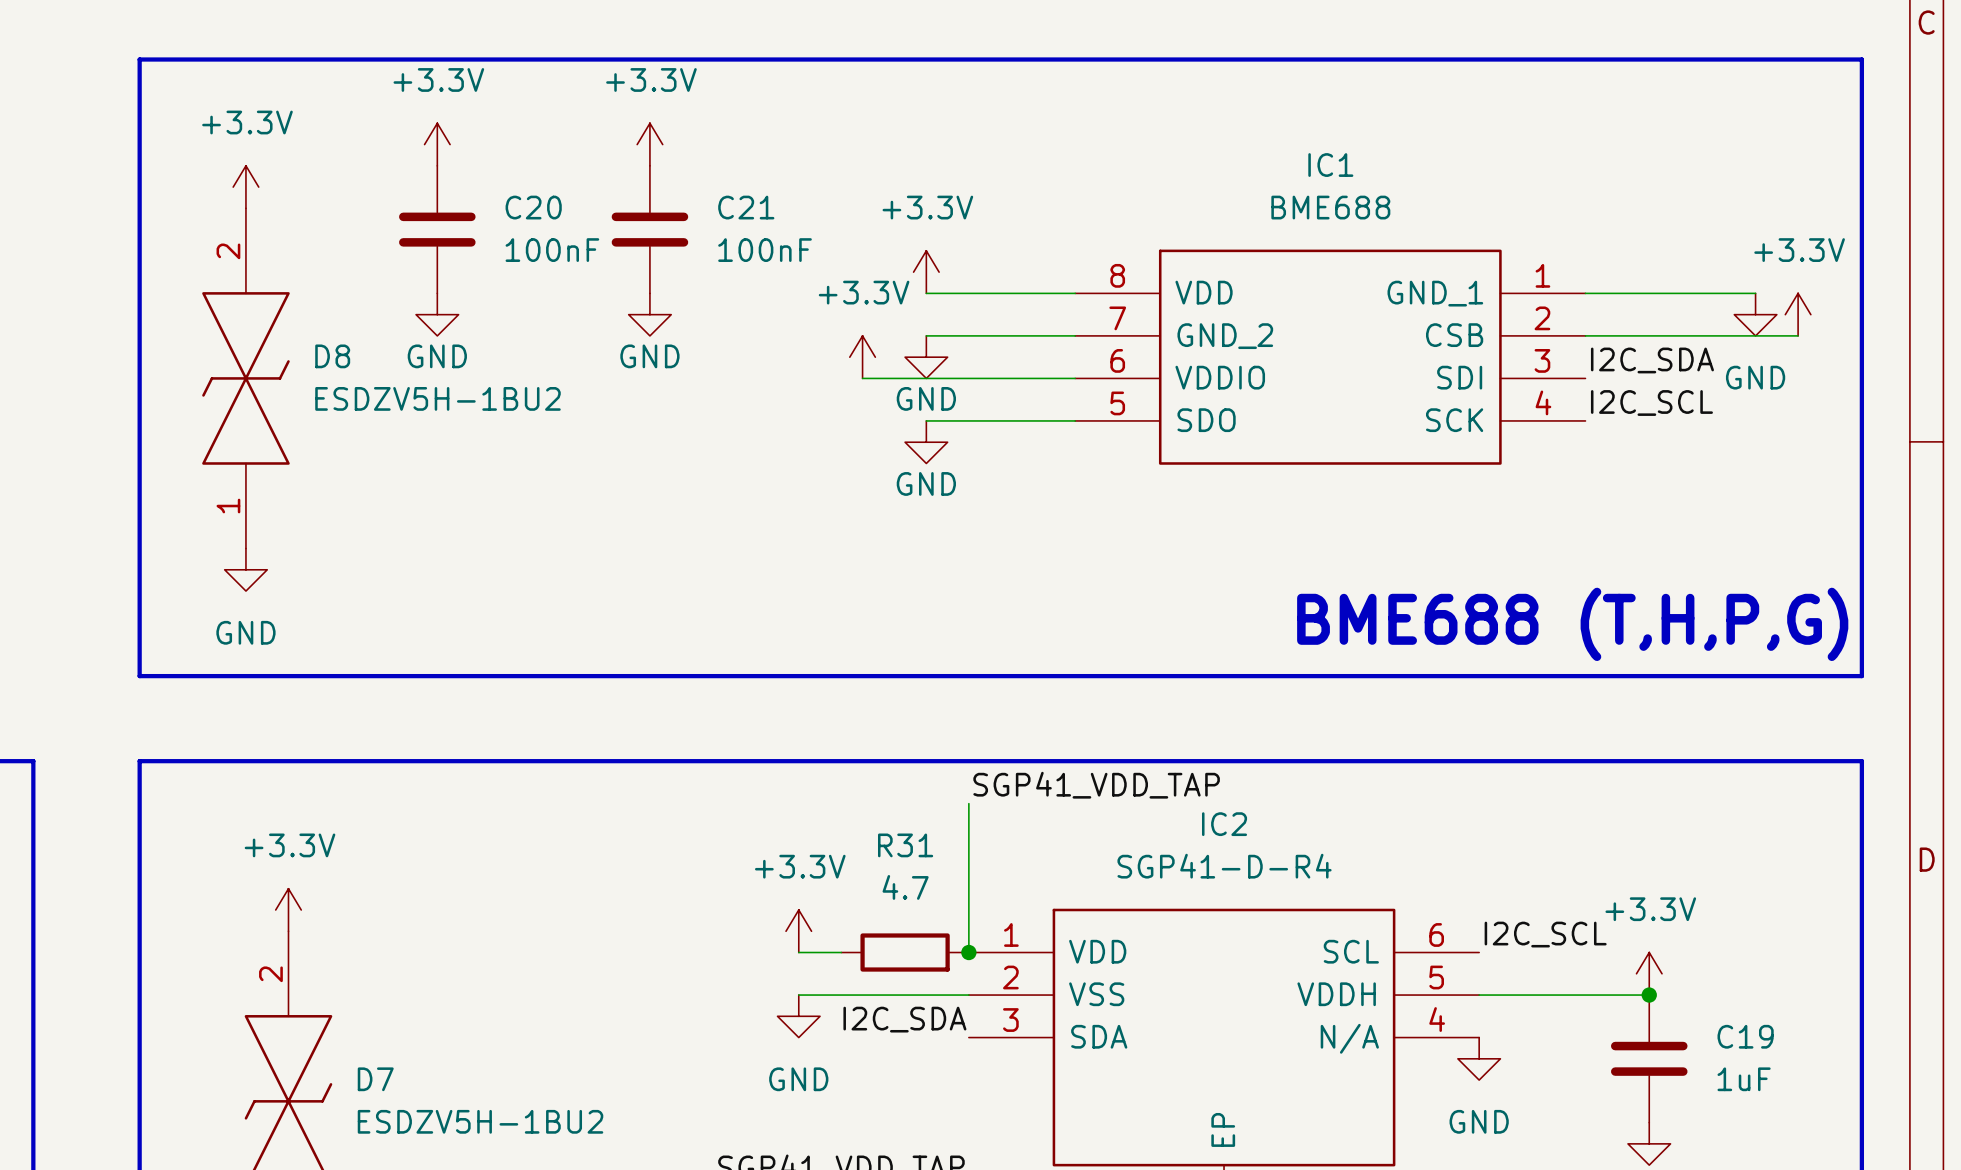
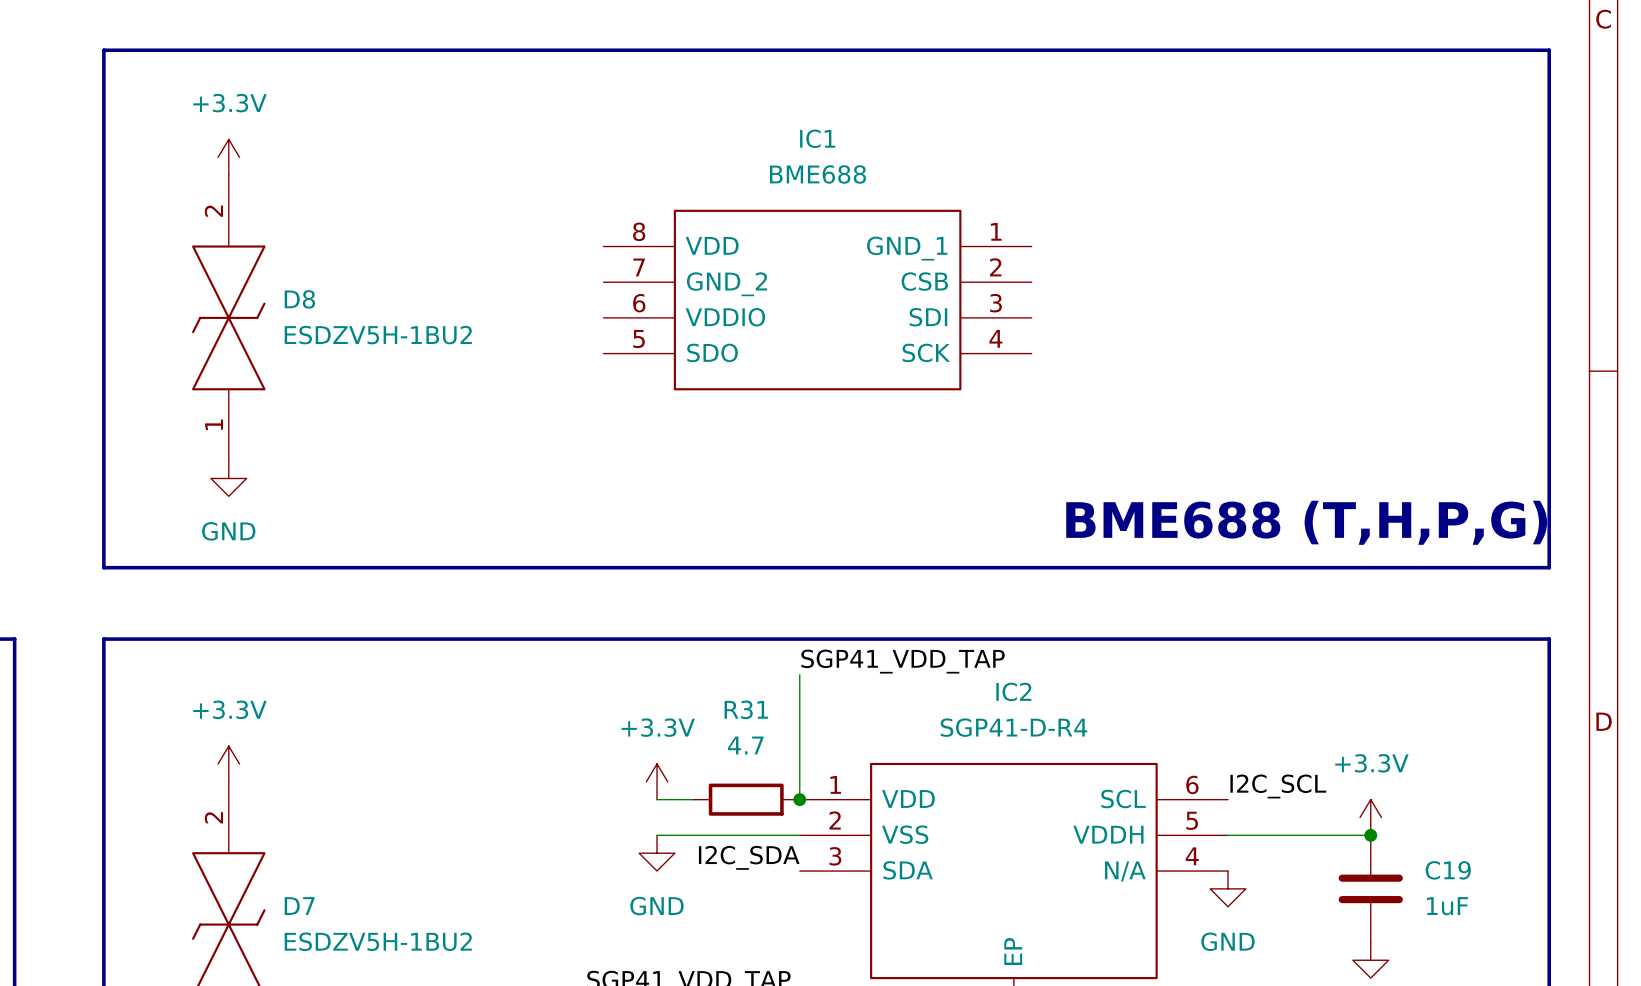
power symbol: +3.3V (437, 144) -> none
power symbol: +3.3V (649, 144) -> none
power symbol position: +3.3V (245, 187) -> +3.3V (228, 157)
C20: 100nF (437, 229) -> none
C21: 100nF (649, 229) -> none
power symbol: +3.3V (926, 272) -> none
wire: (926, 293) (1075, 293) -> none
wire: (1585, 293) (1755, 293) -> none
power symbol: GND (437, 314) -> none
power symbol: GND (649, 314) -> none
power symbol: GND (1755, 314) -> none
power symbol: +3.3V (1798, 314) -> none
wire: (926, 335) (1075, 335) -> none
wire: (1585, 335) (1798, 335) -> none
power symbol: +3.3V (862, 357) -> none
power symbol: GND (926, 357) -> none
IC1 position: (1330, 357) -> (817, 300)
label: I2C_SDA (1652, 360) -> none
D8 position: (245, 378) -> (228, 317)
wire: (862, 378) (1075, 378) -> none
label: I2C_SCL (1651, 403) -> none
wire: (926, 420) (1075, 420) -> none
power symbol: GND (926, 442) -> none
power symbol position: GND (245, 569) -> GND (228, 478)

